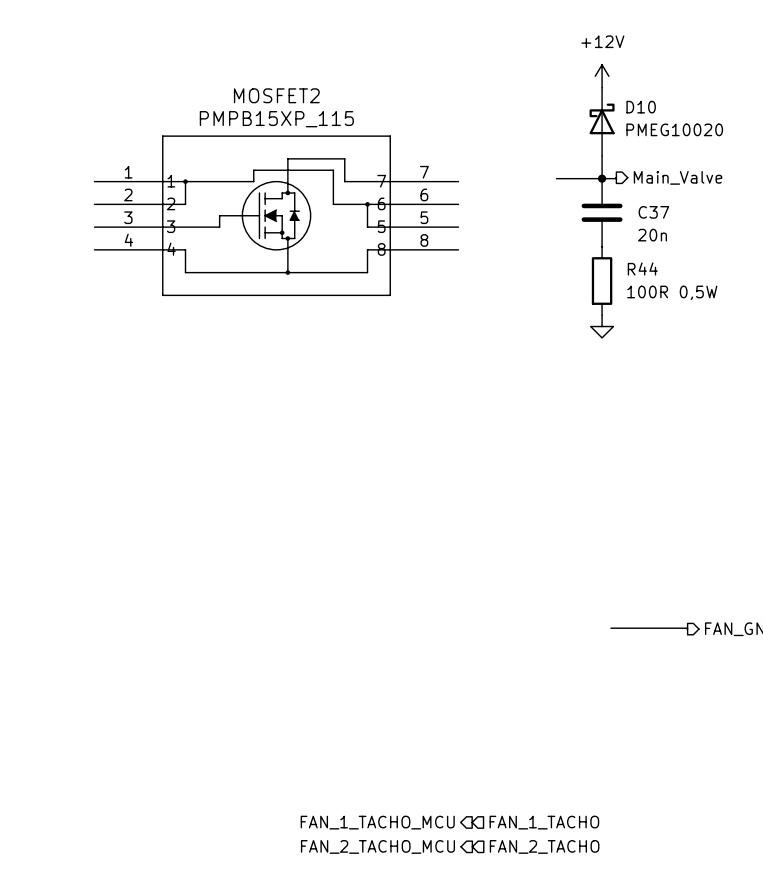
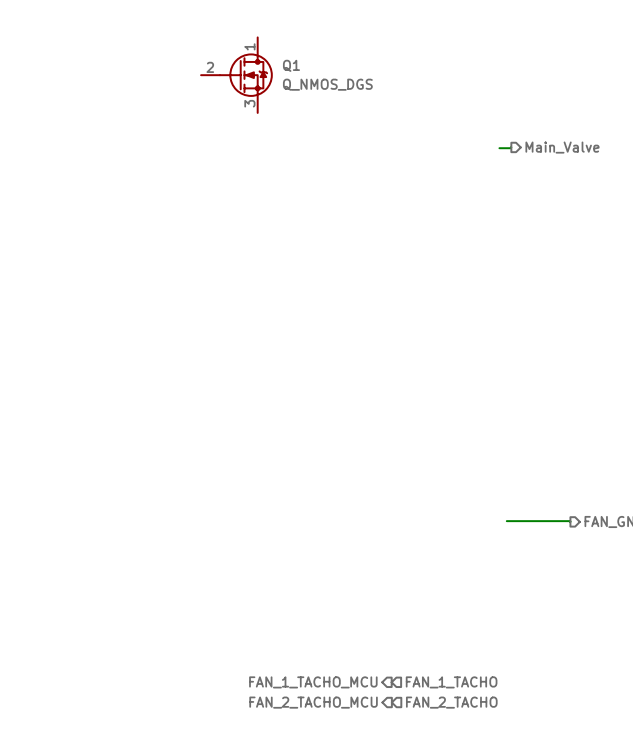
power symbol: +12V (602, 76) -> none
Q1: none -> Q_NMOS_DGS (236, 75)
D10: PMEG10020 (602, 121) -> none
wire: (602, 155) (602, 178) (556, 178) -> none
junction: (602, 178) -> none
C37: 20n (602, 212) -> none
MOSFET2: PMPB15XP_115 (276, 215) -> none
R44: 100R 0,5W (602, 281) -> none
power symbol: (602, 326) -> none

